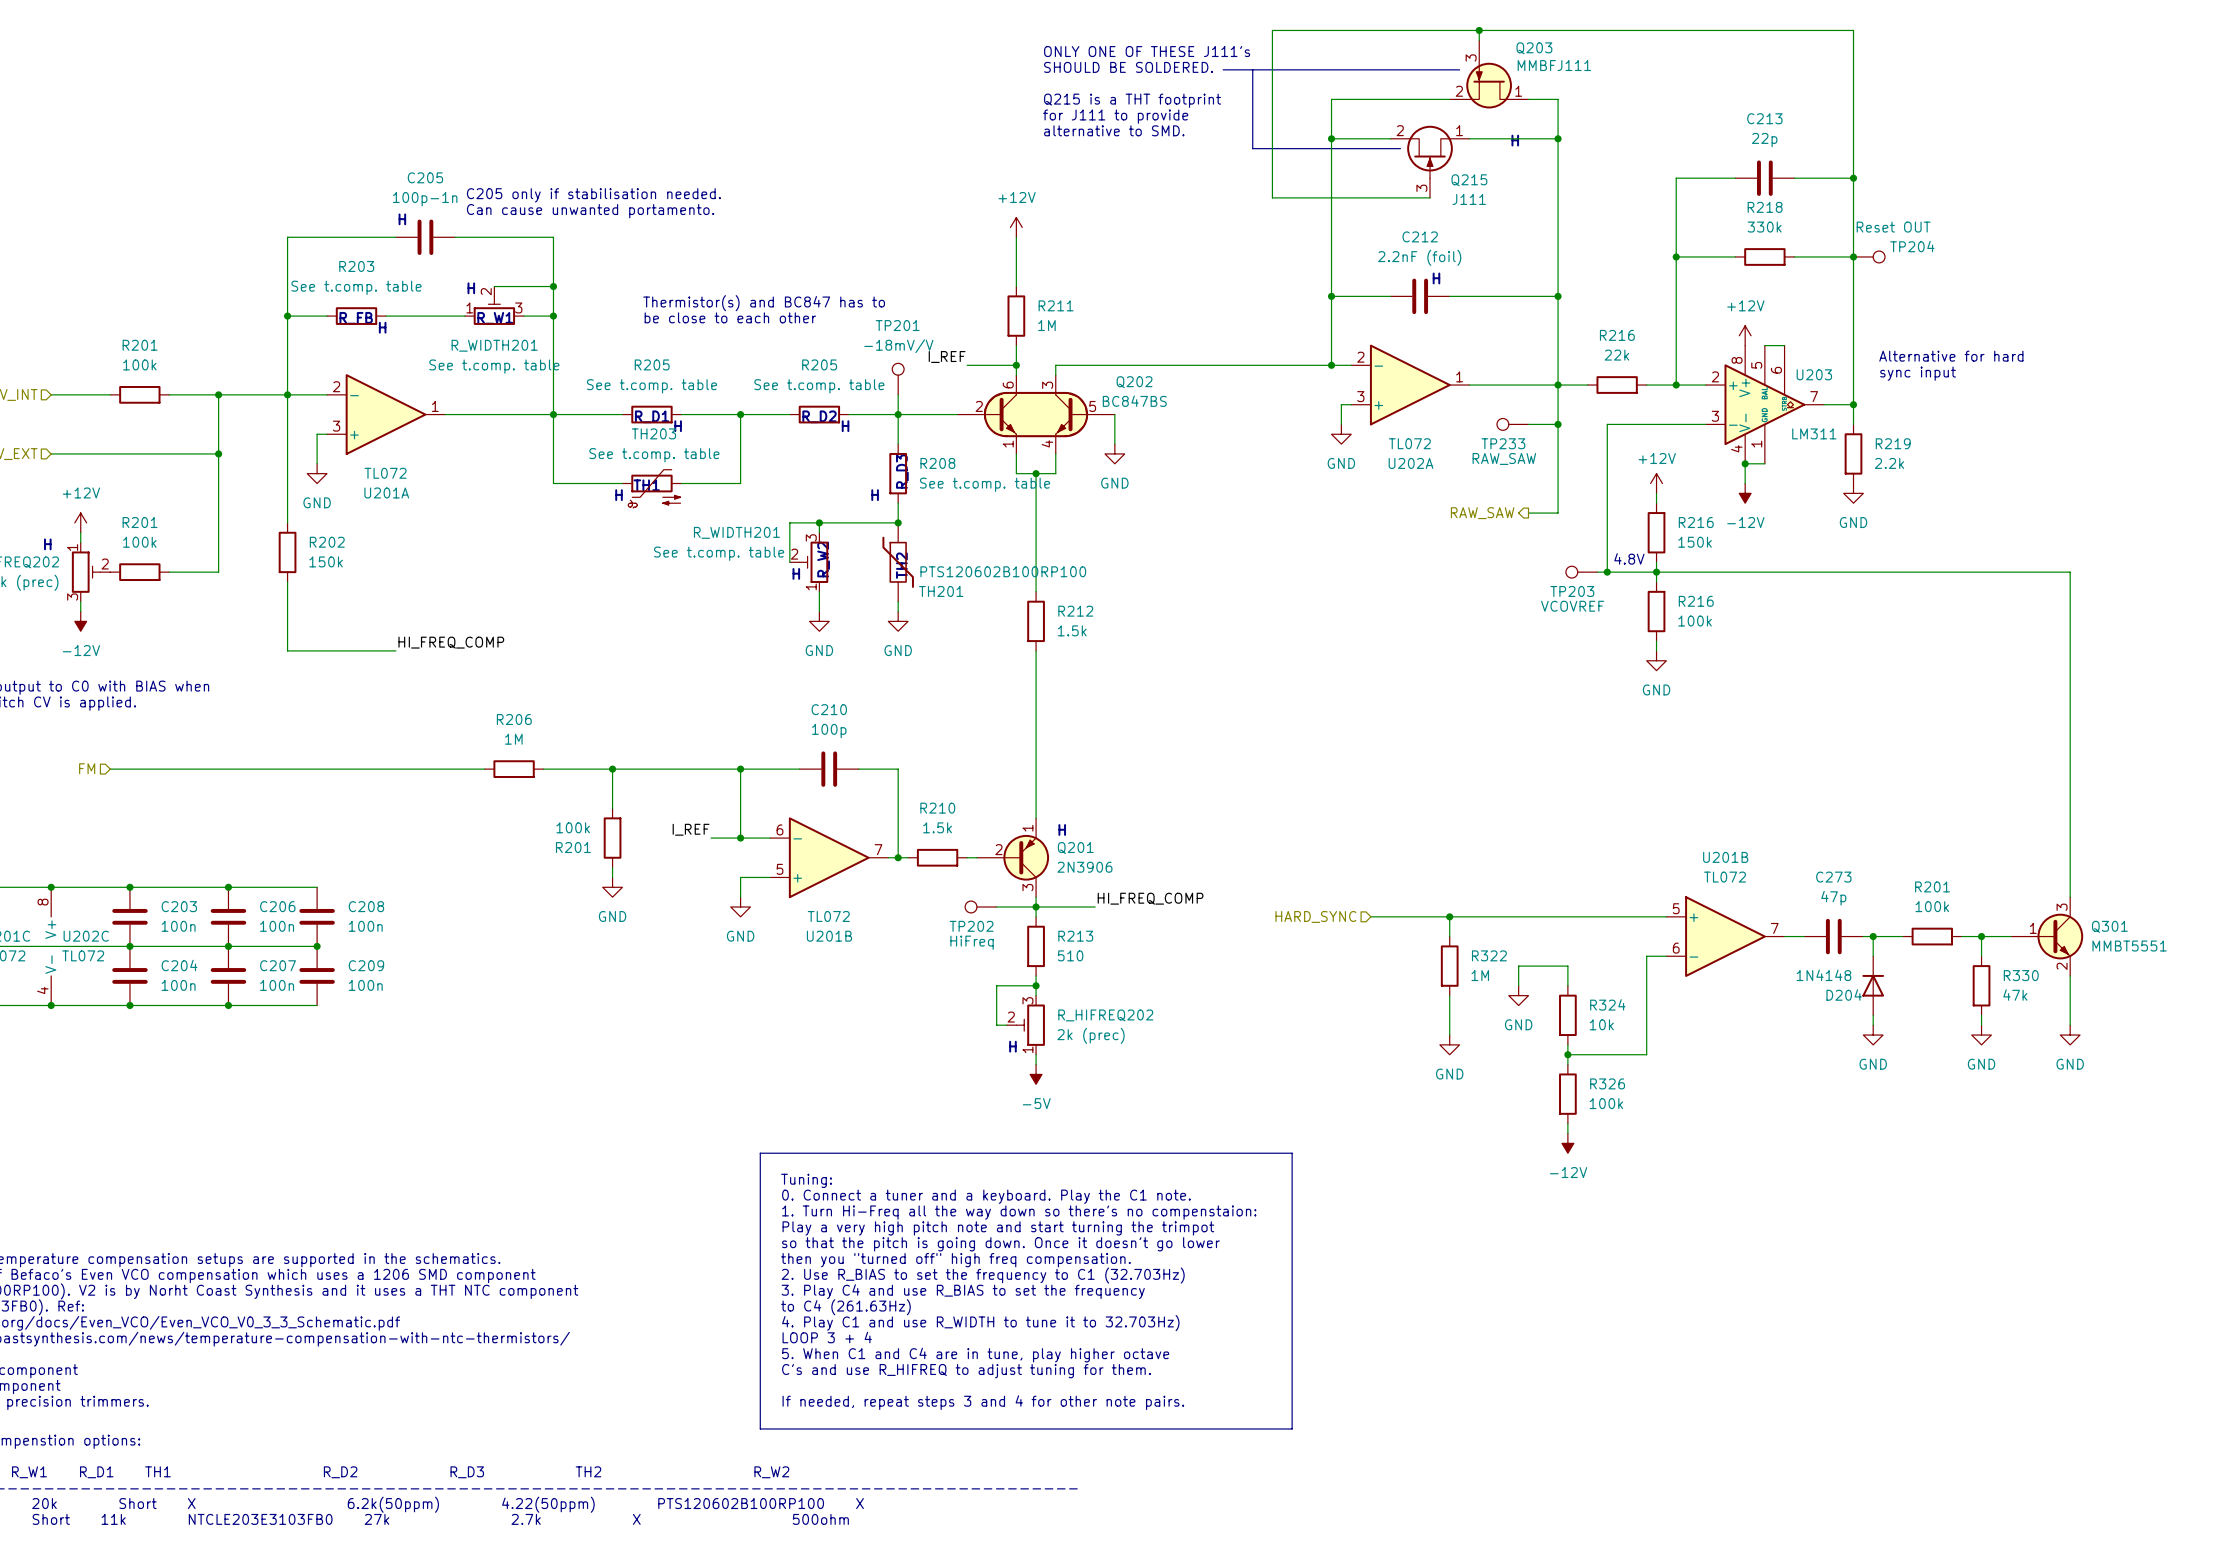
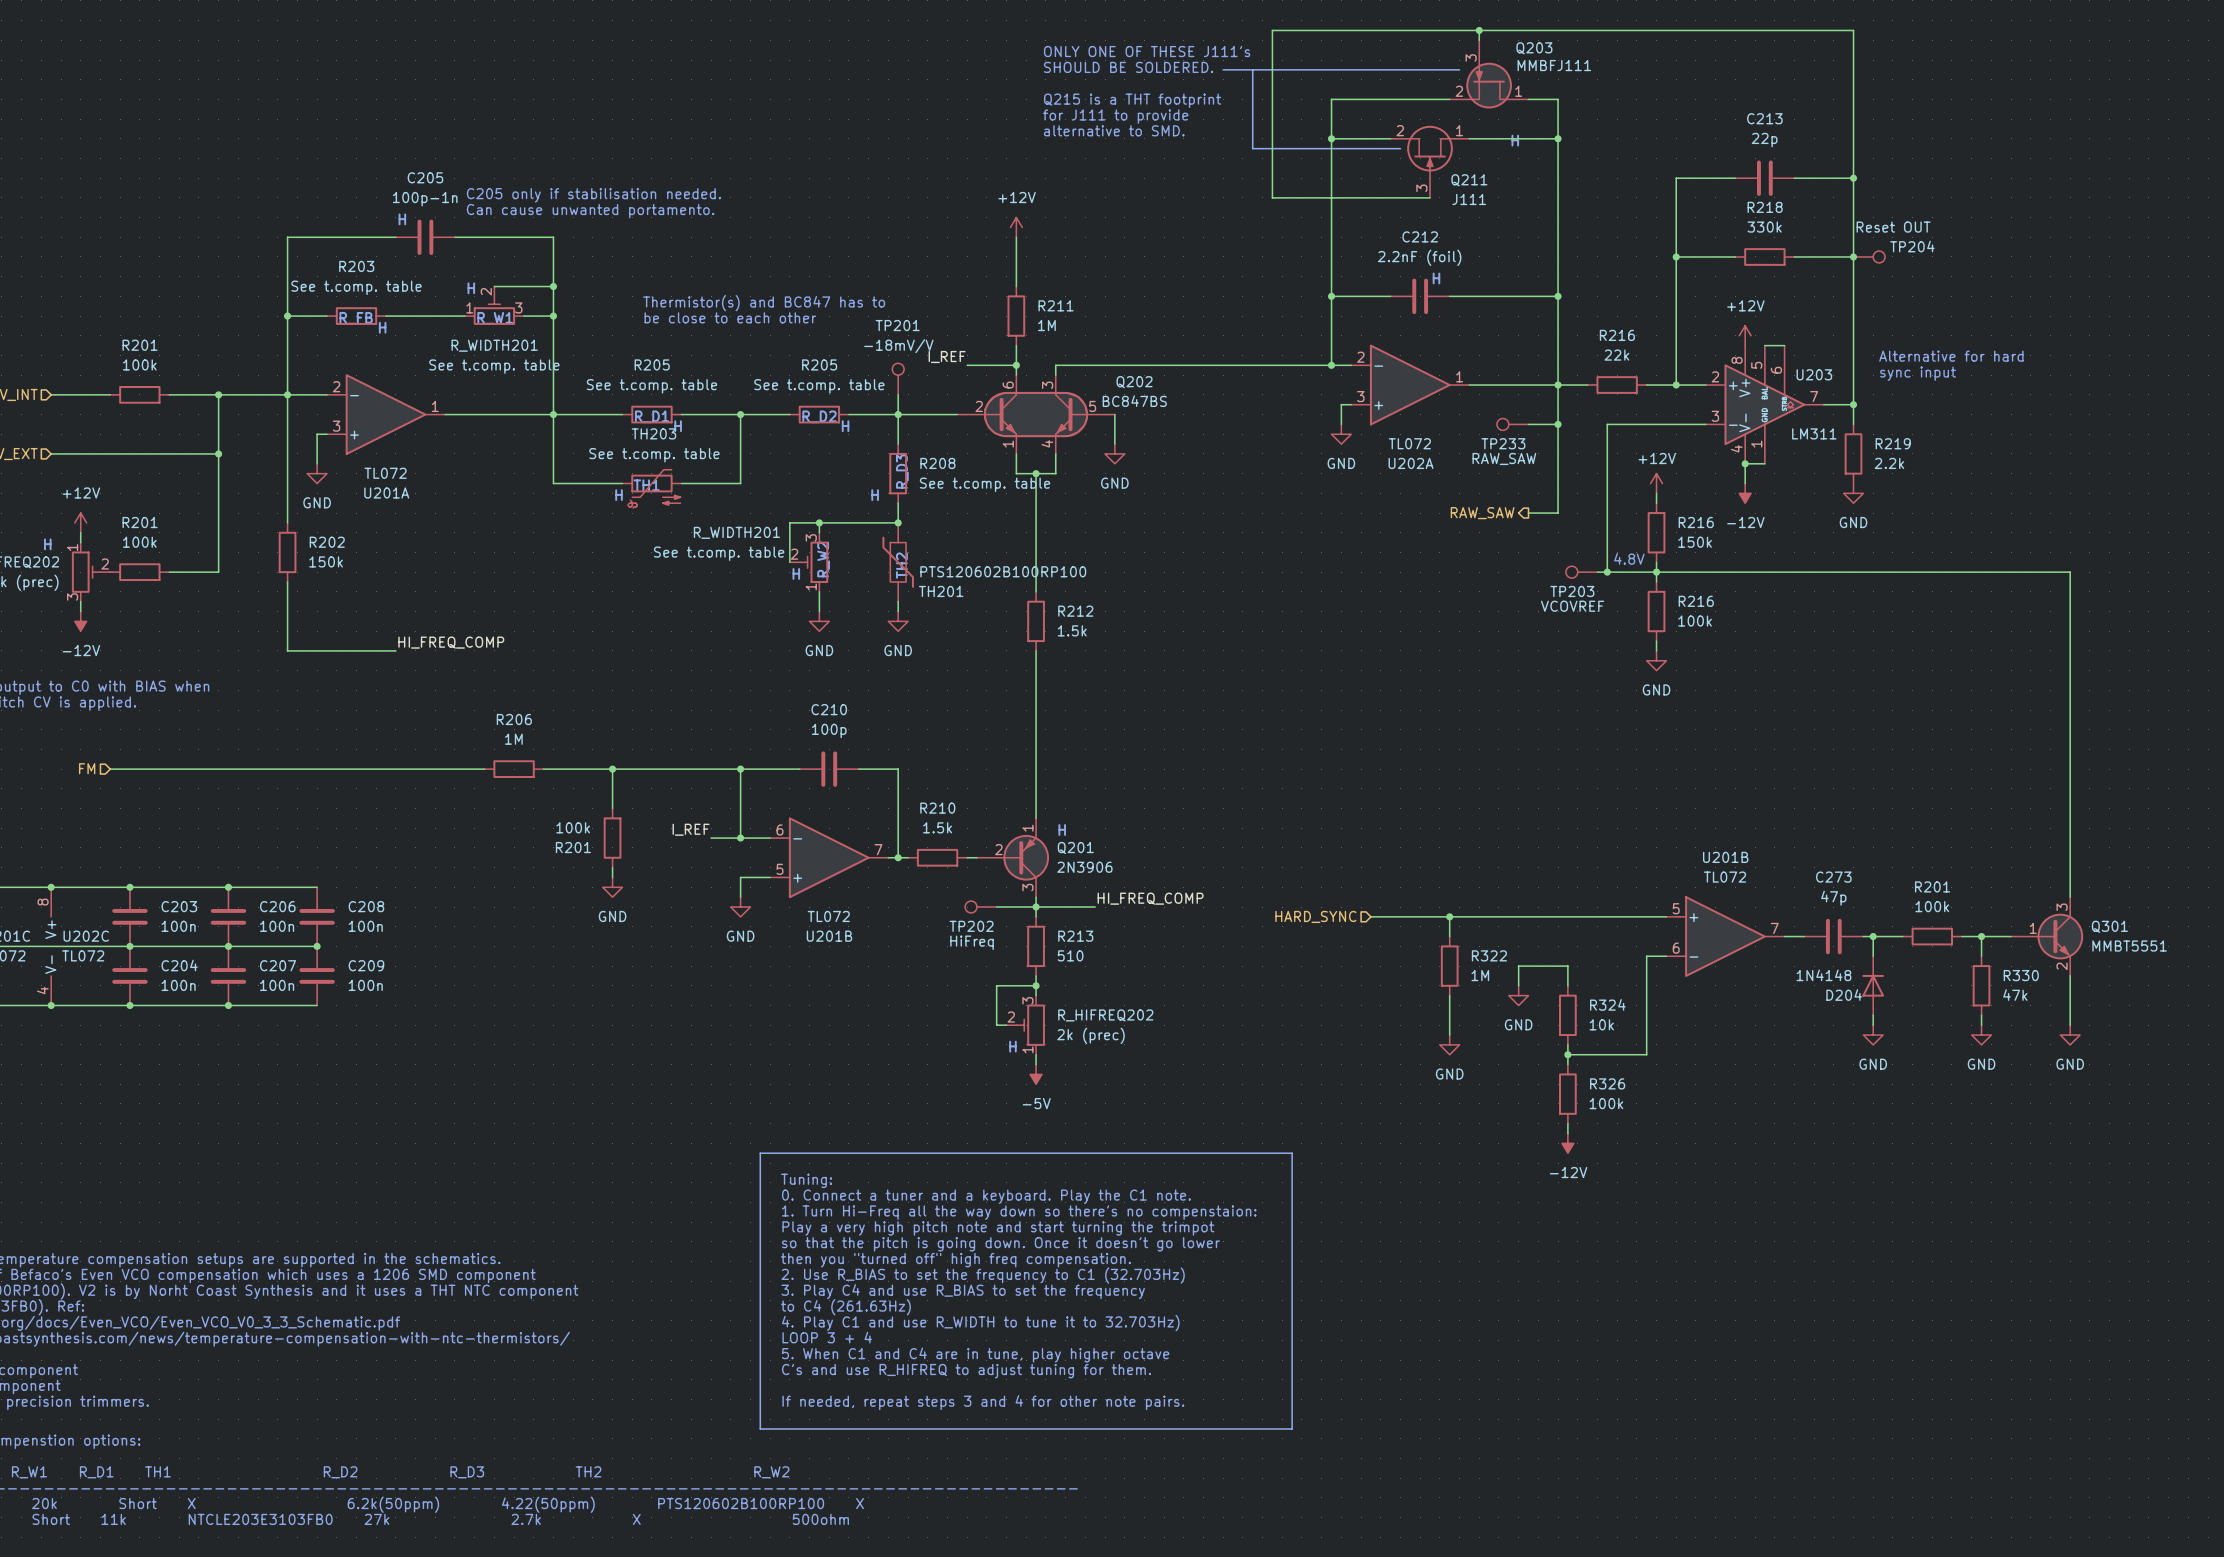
Q215 name: Q215 (1469, 180) -> Q211 (1469, 180)

